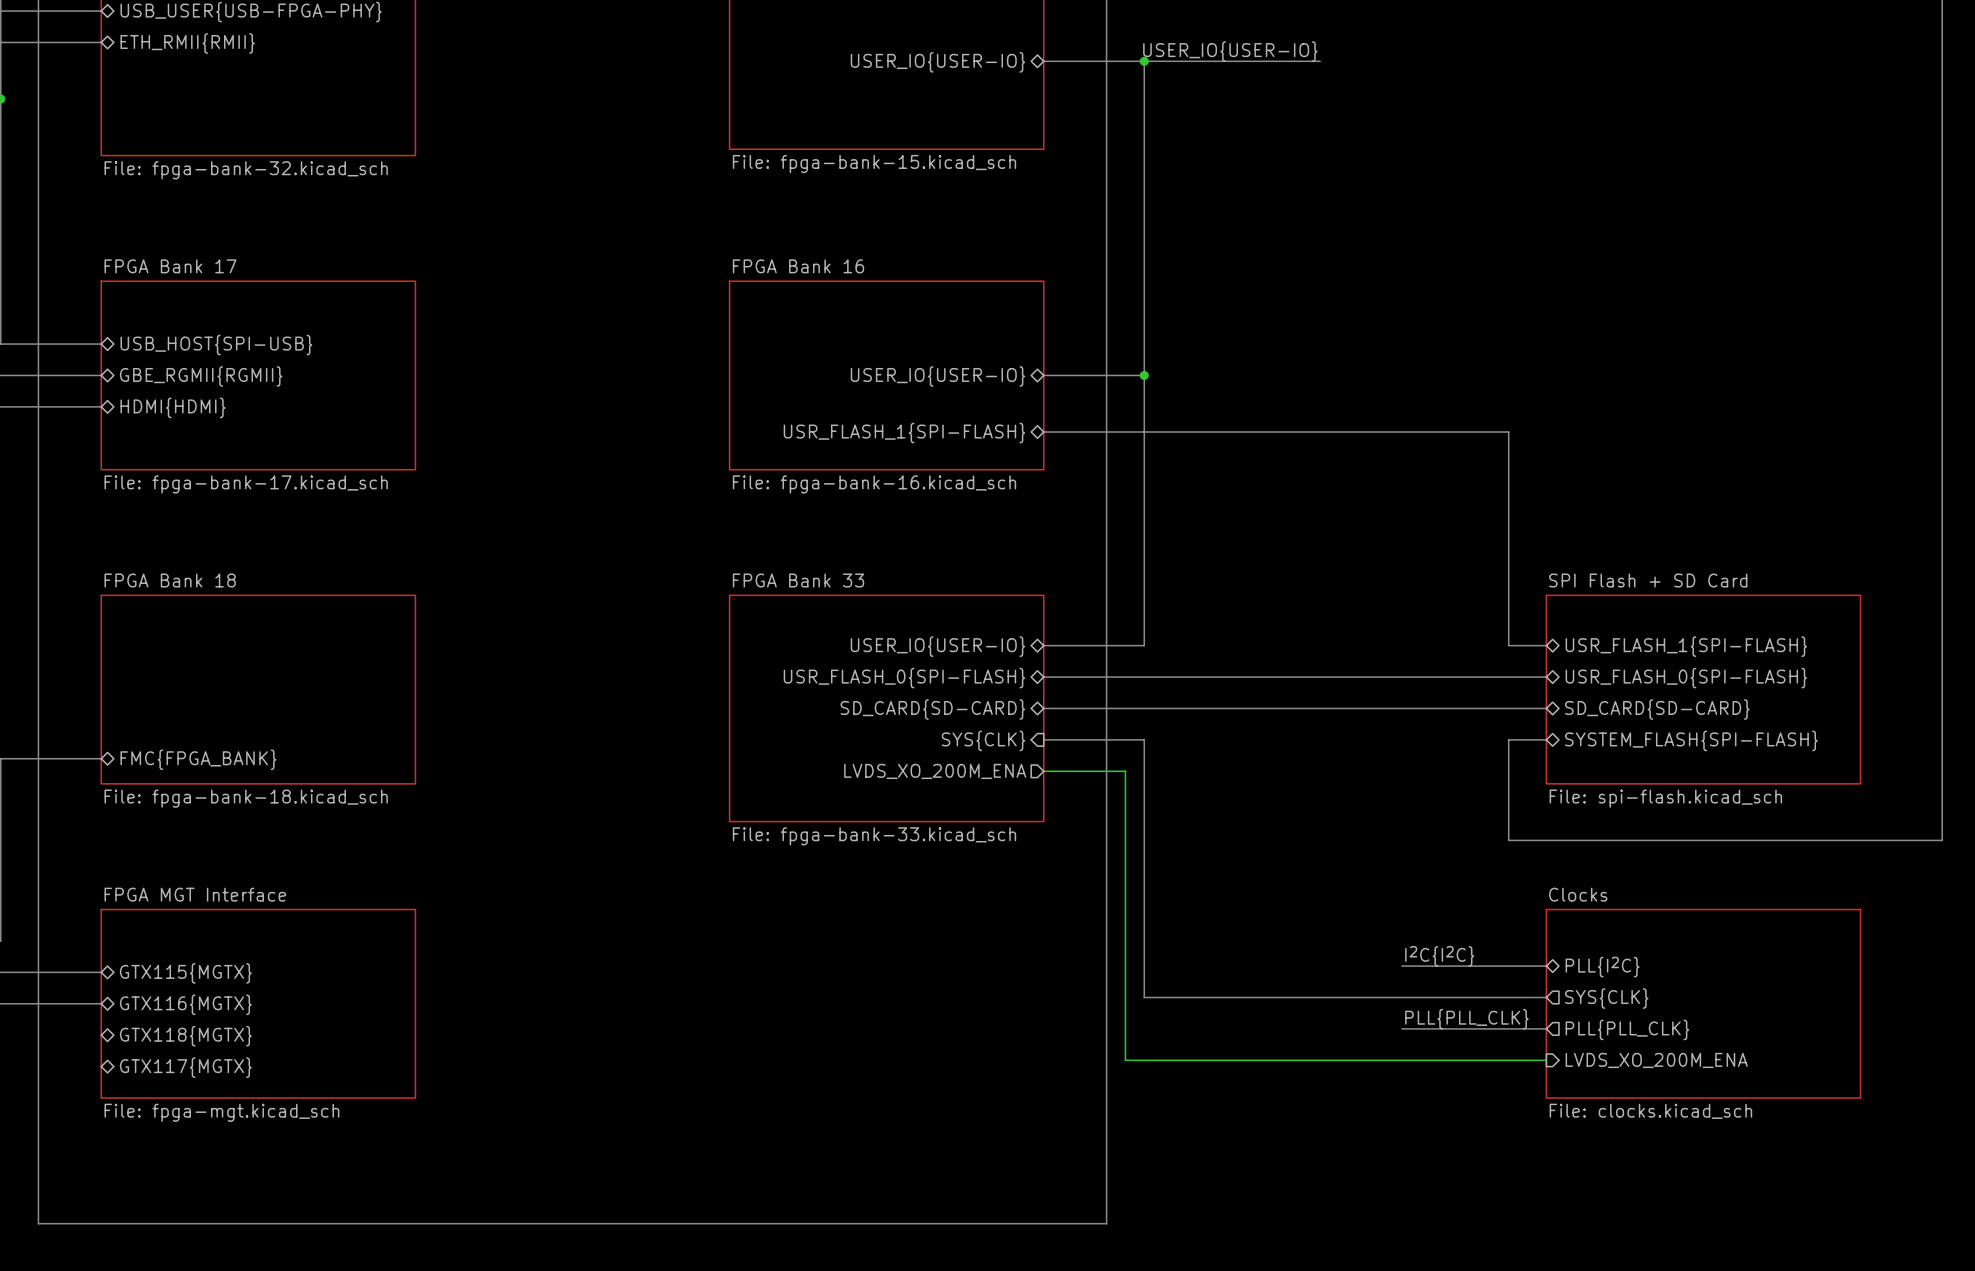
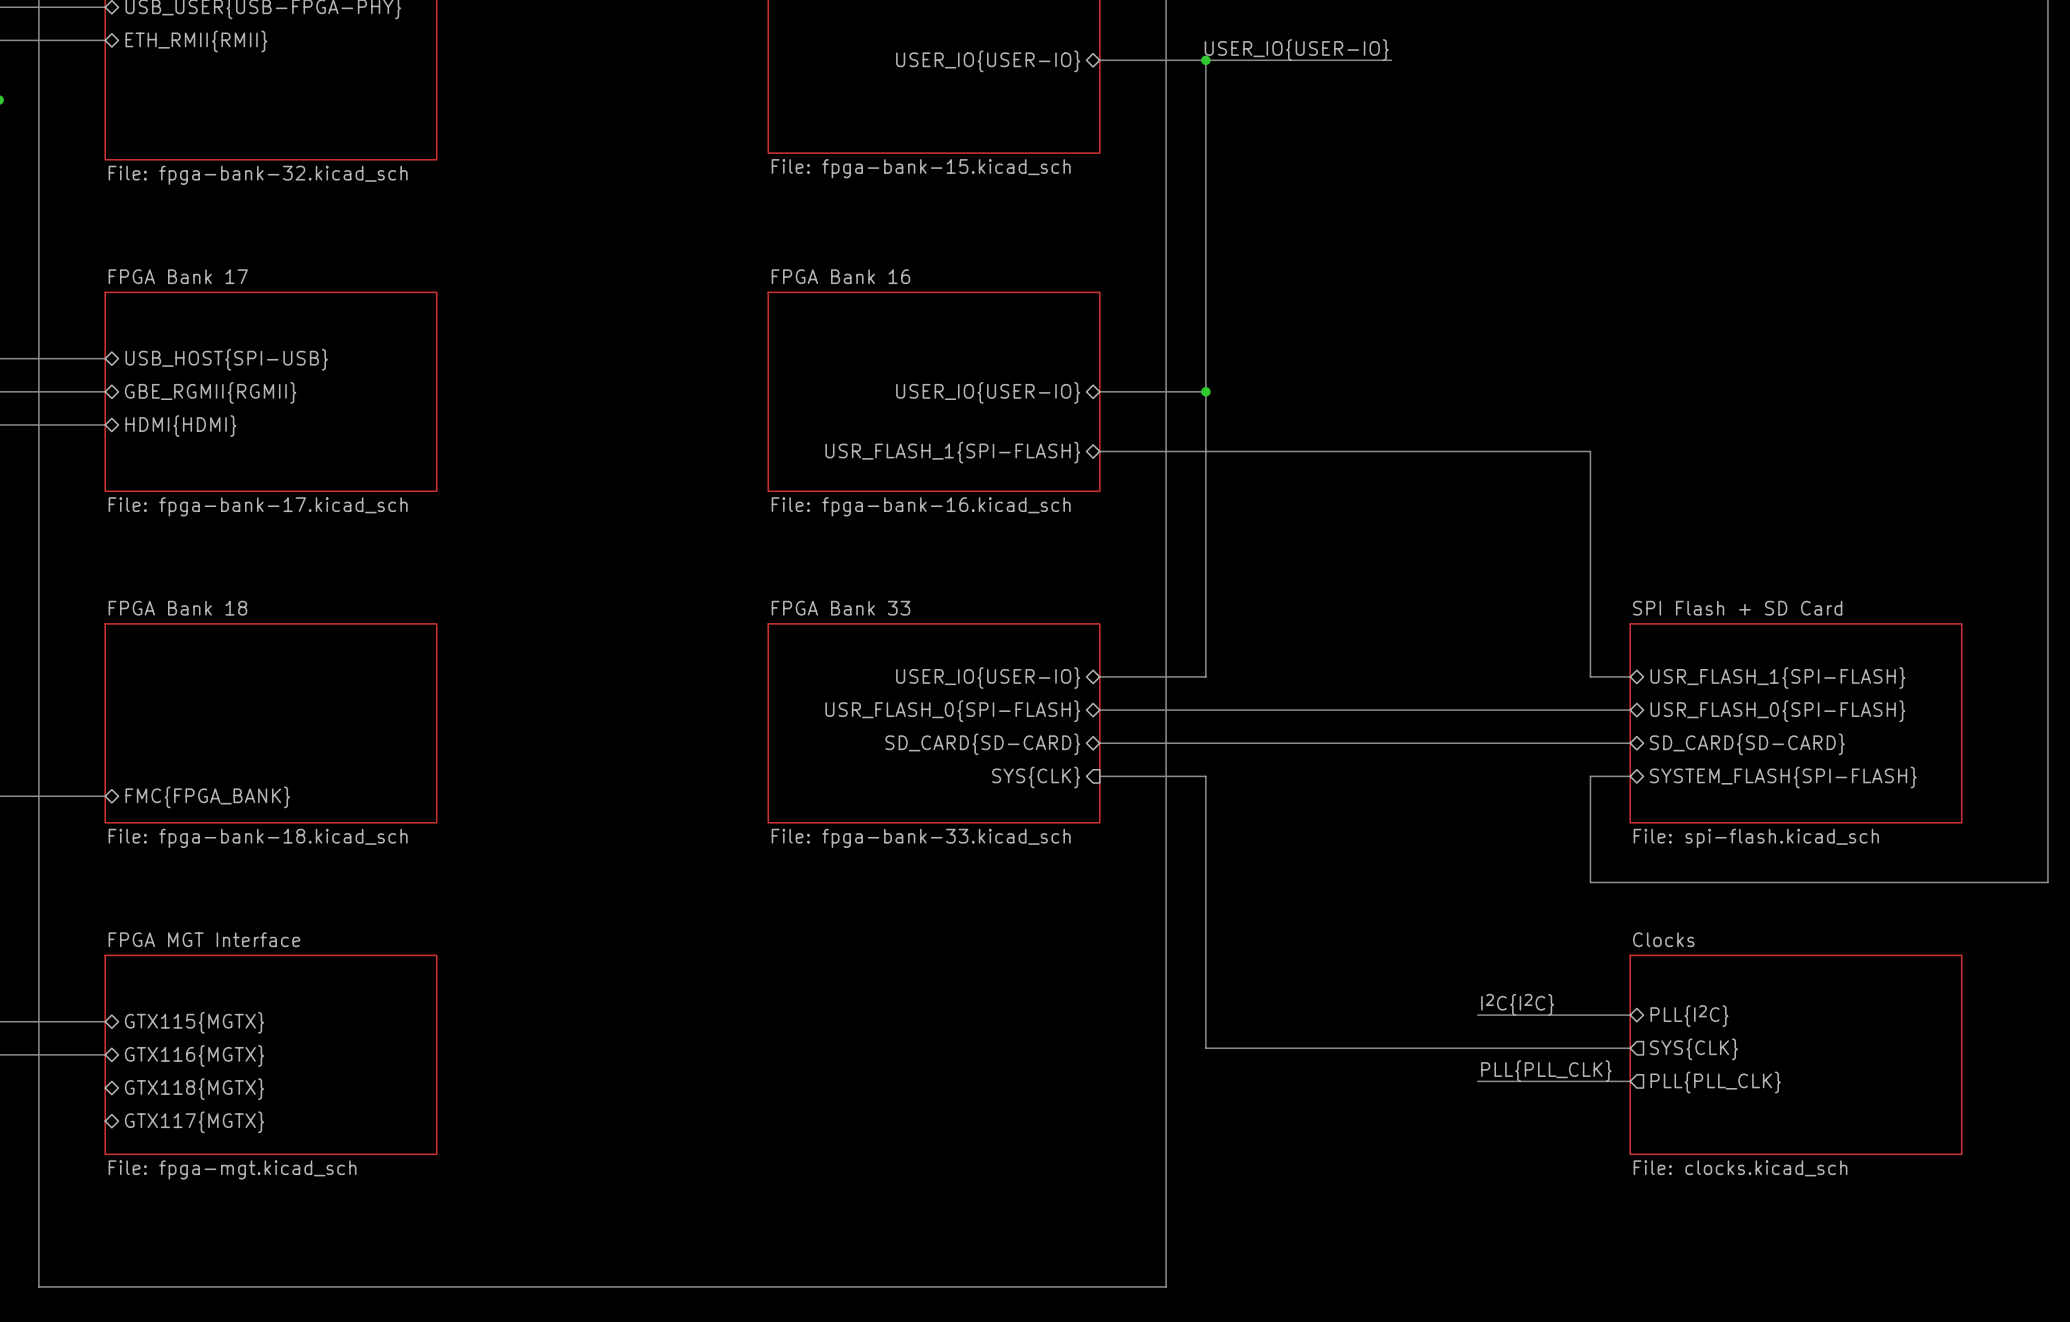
sheet FPGA Bank 33 shape: [728, 594, 1045, 823] -> [767, 623, 1101, 824]
sheet pin: LVDS_XO_200M_ENA (935, 771) -> none
wire: (1043, 771) (1125, 771) (1125, 1060) (1546, 1060) -> none
sheet pin: LVDS_XO_200M_ENA (1656, 1060) -> none

